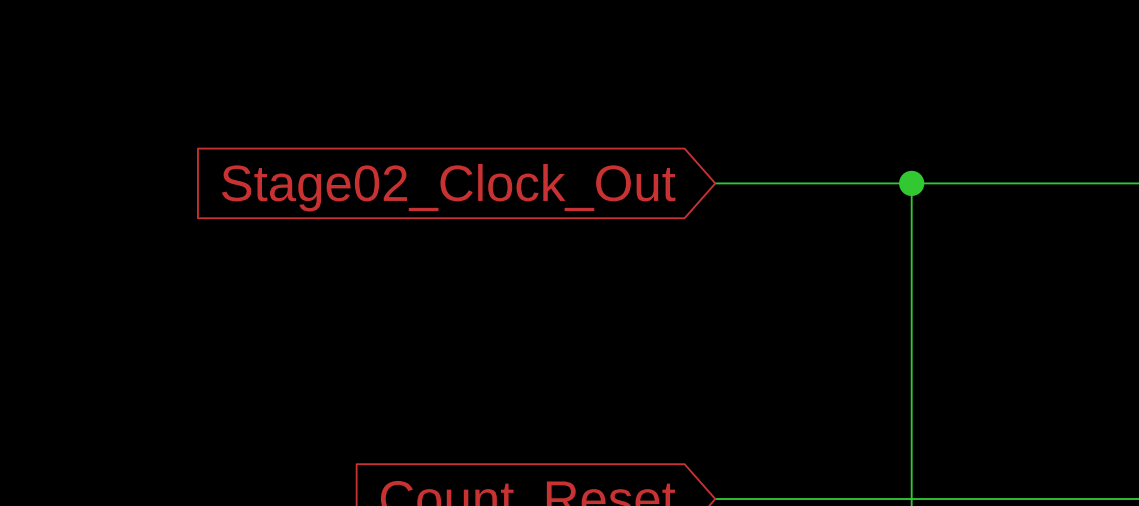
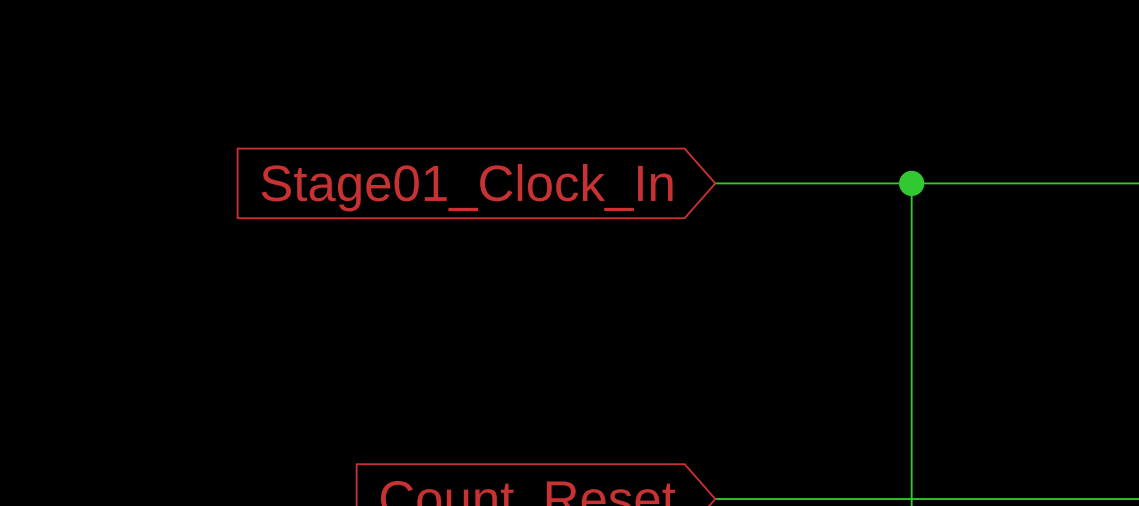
global label: Stage02_Clock_Out (448, 187) -> Stage01_Clock_In (467, 187)

